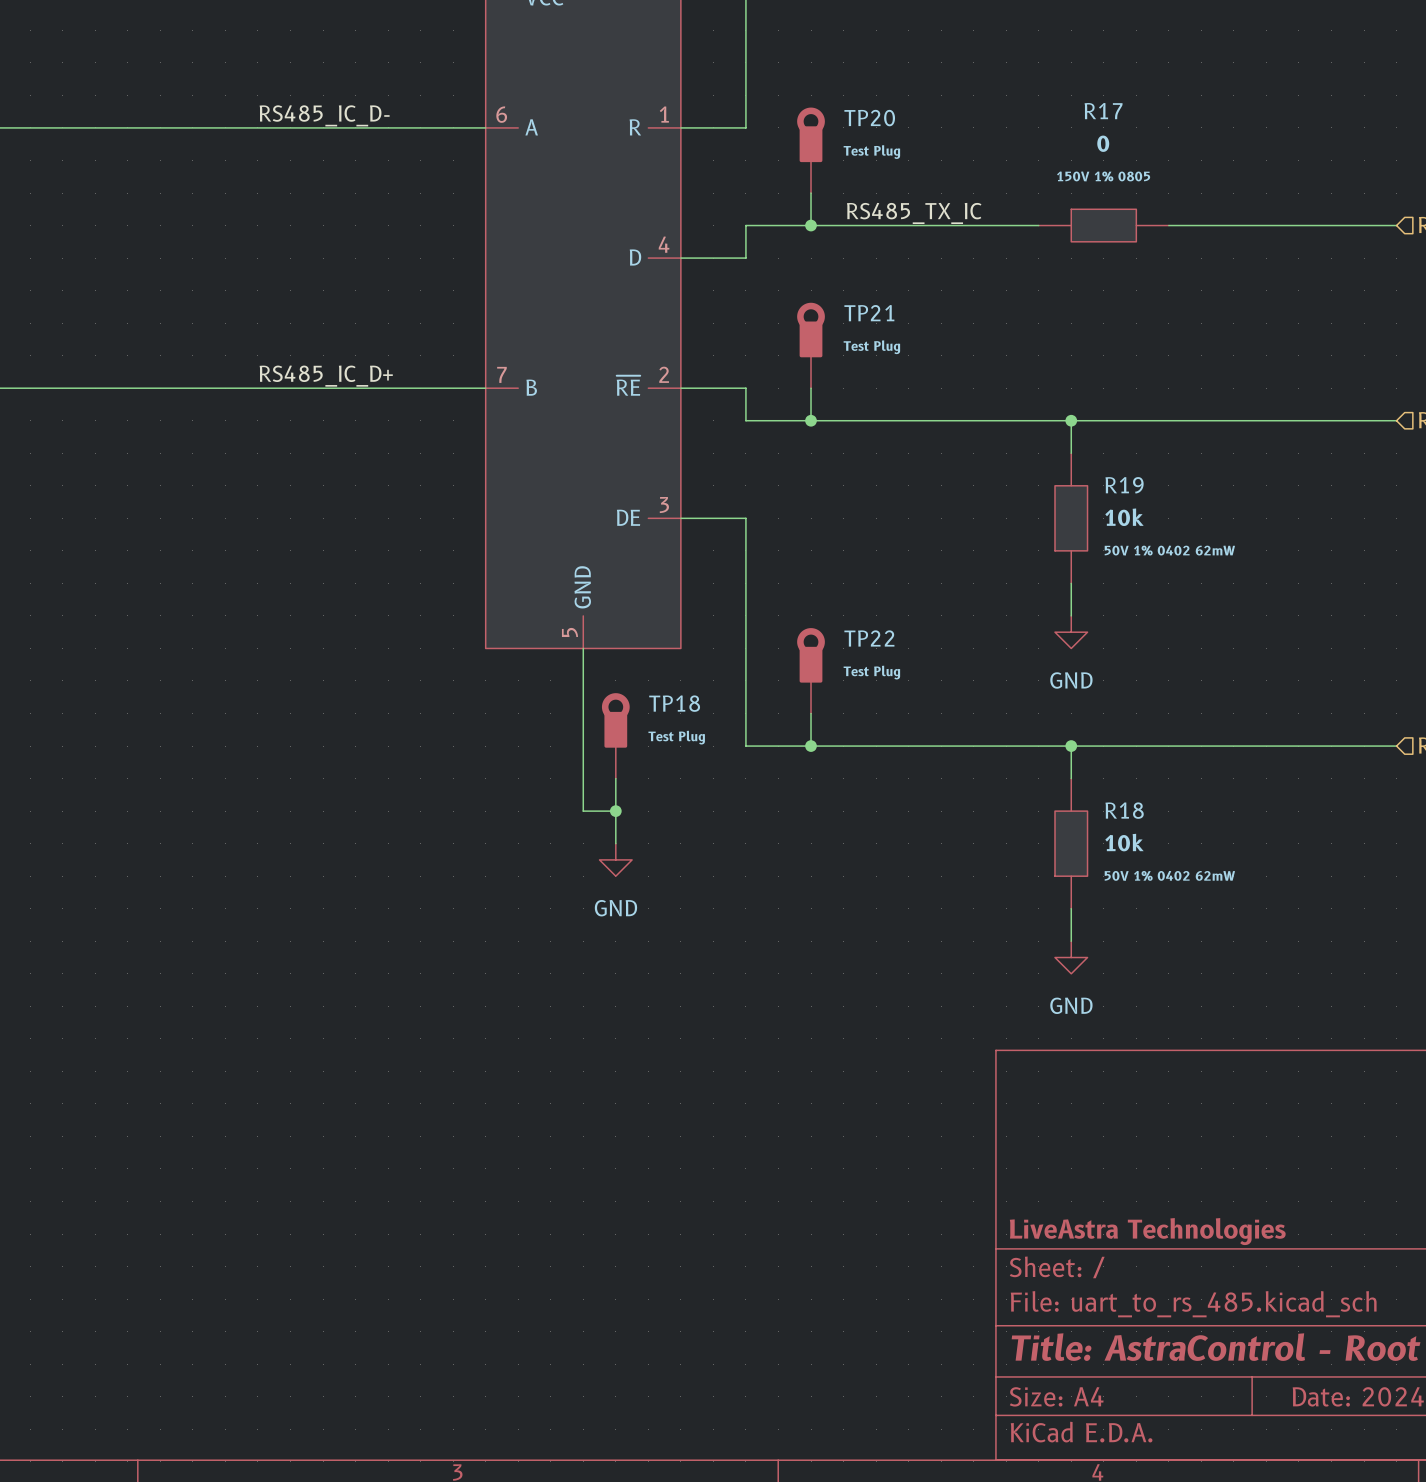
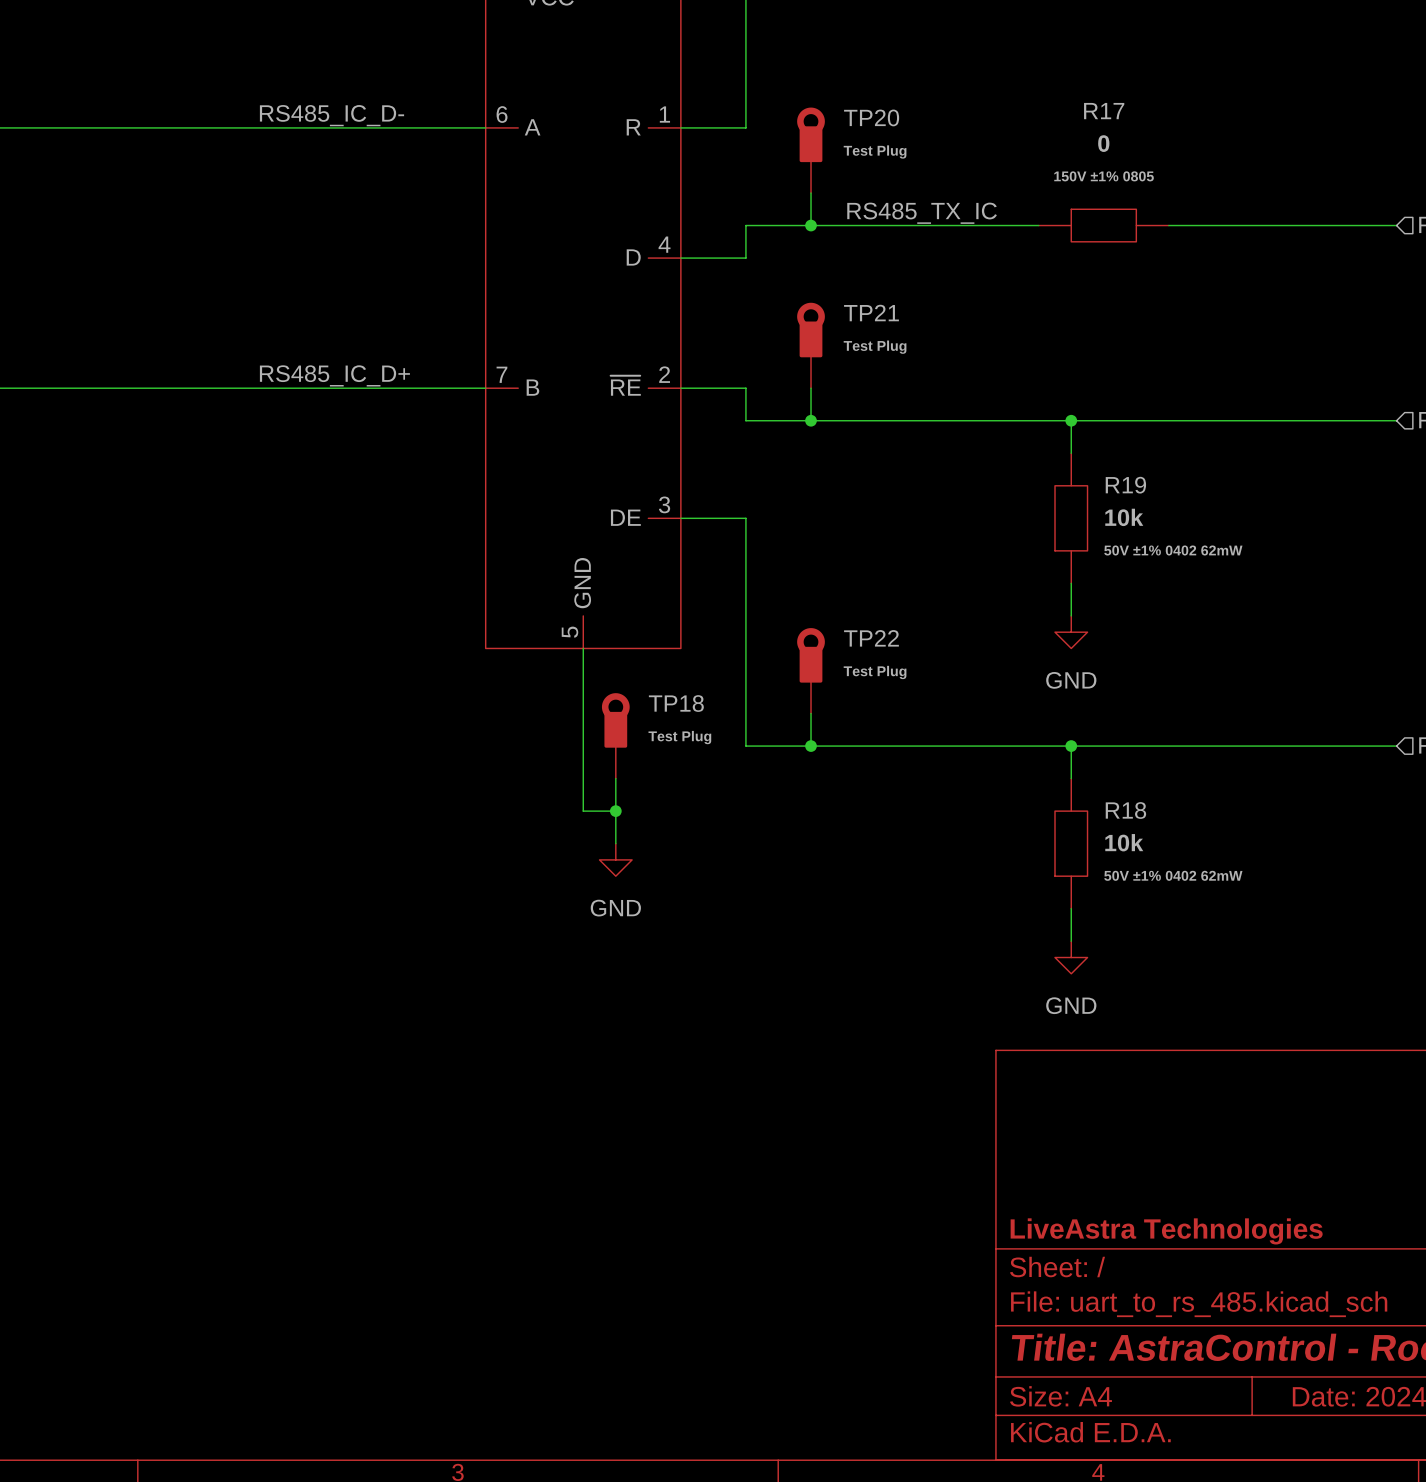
R17 text: 150V 1% 0805 (1103, 176) -> 150V ±1% 0805 (1104, 176)
R19 text: 50V 1% 0402 62mW (1169, 550) -> 50V ±1% 0402 62mW (1173, 550)
R18 text: 50V 1% 0402 62mW (1169, 875) -> 50V ±1% 0402 62mW (1173, 875)

